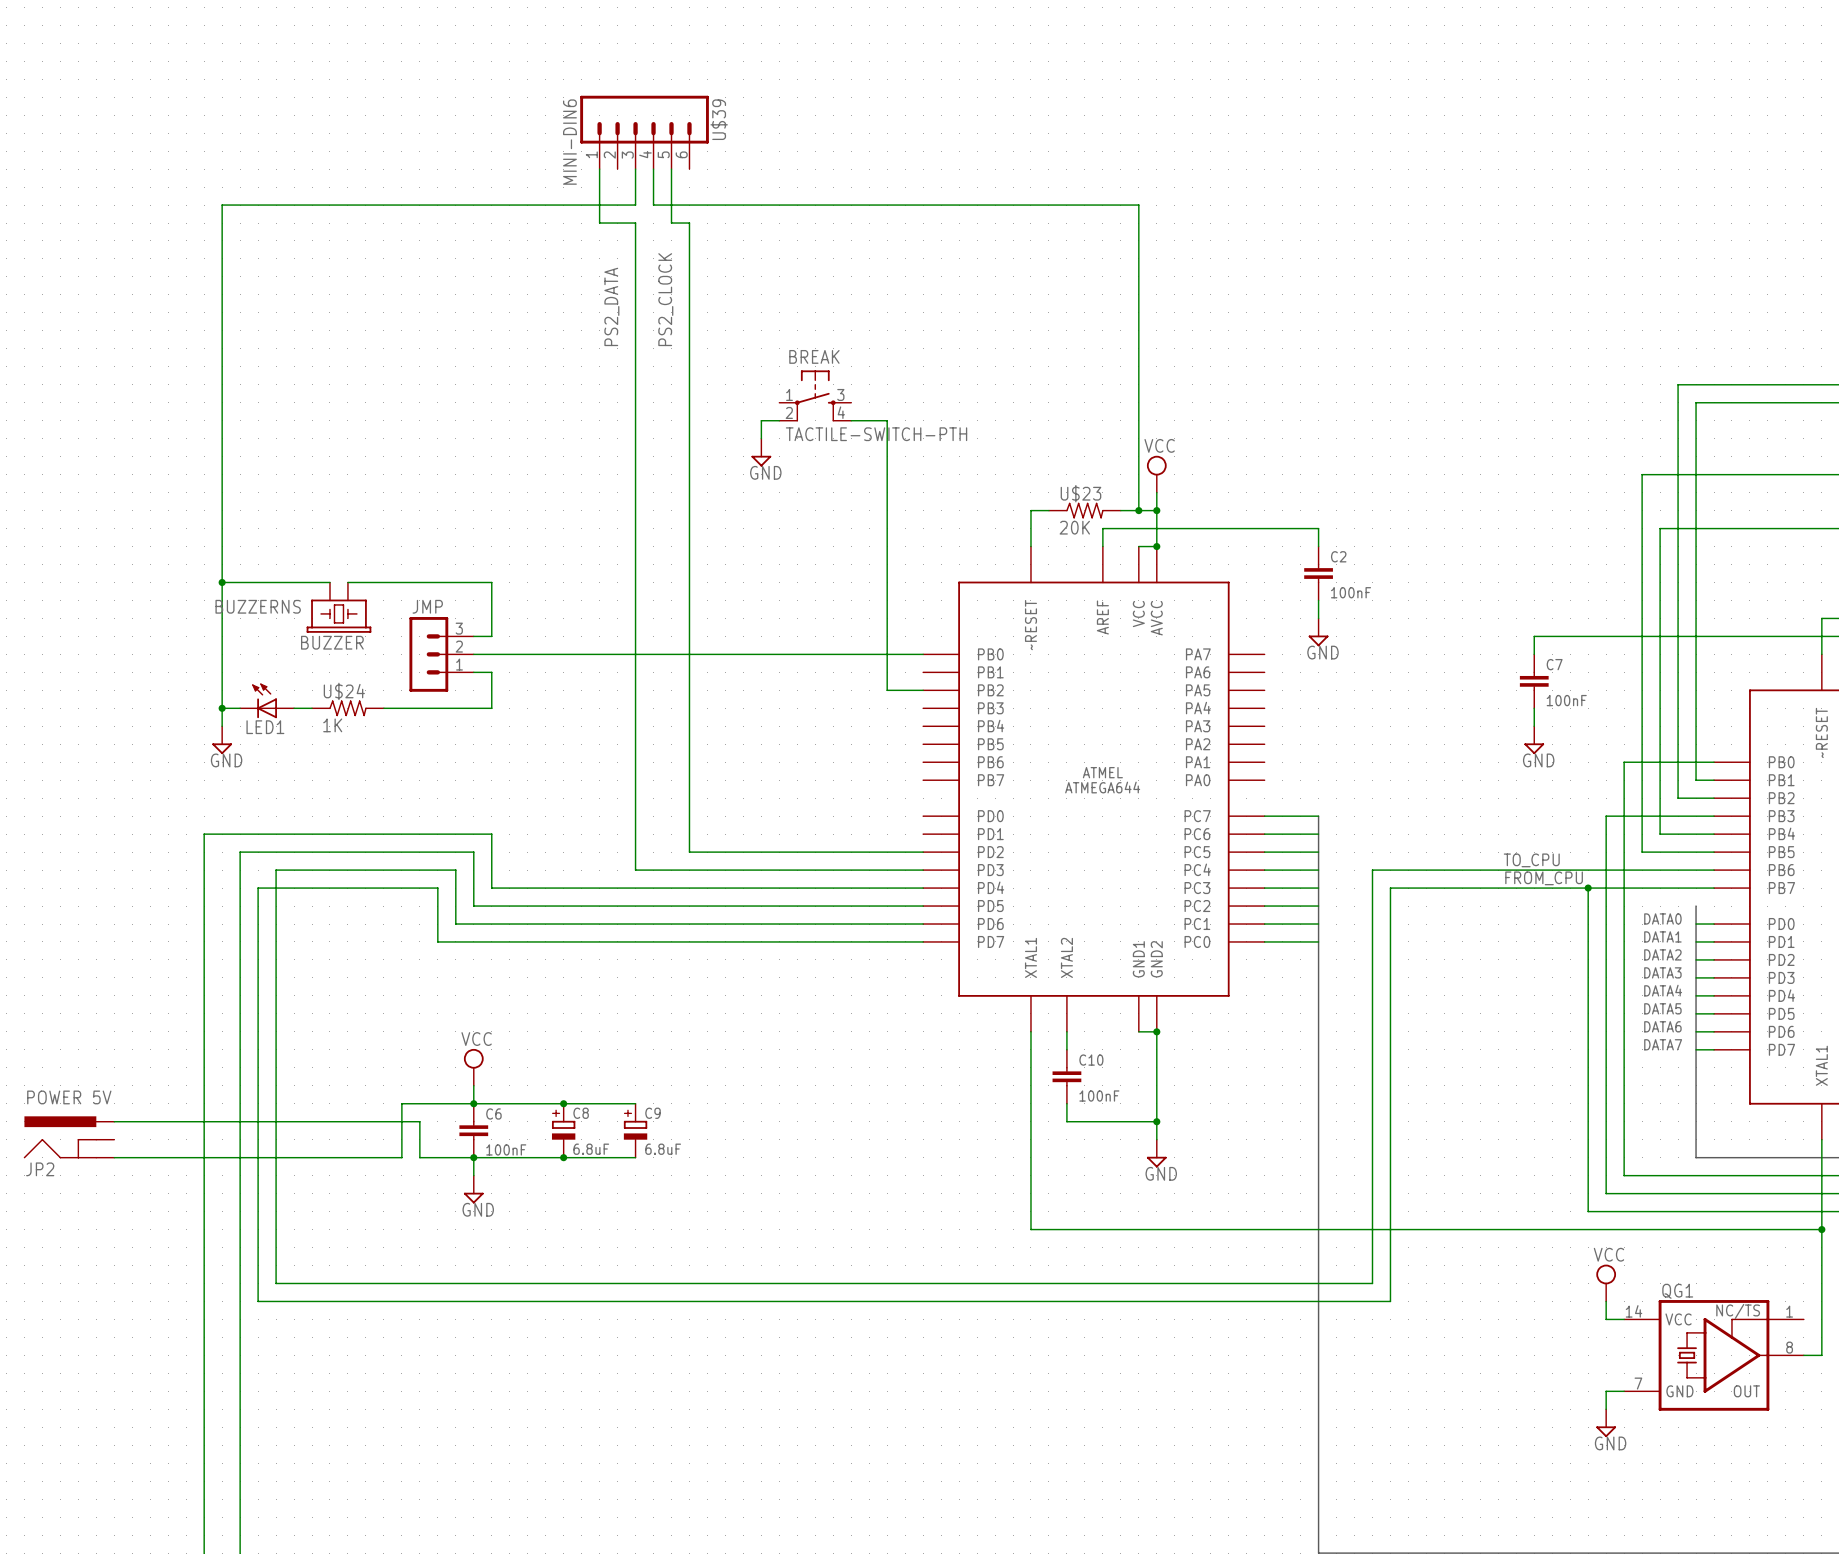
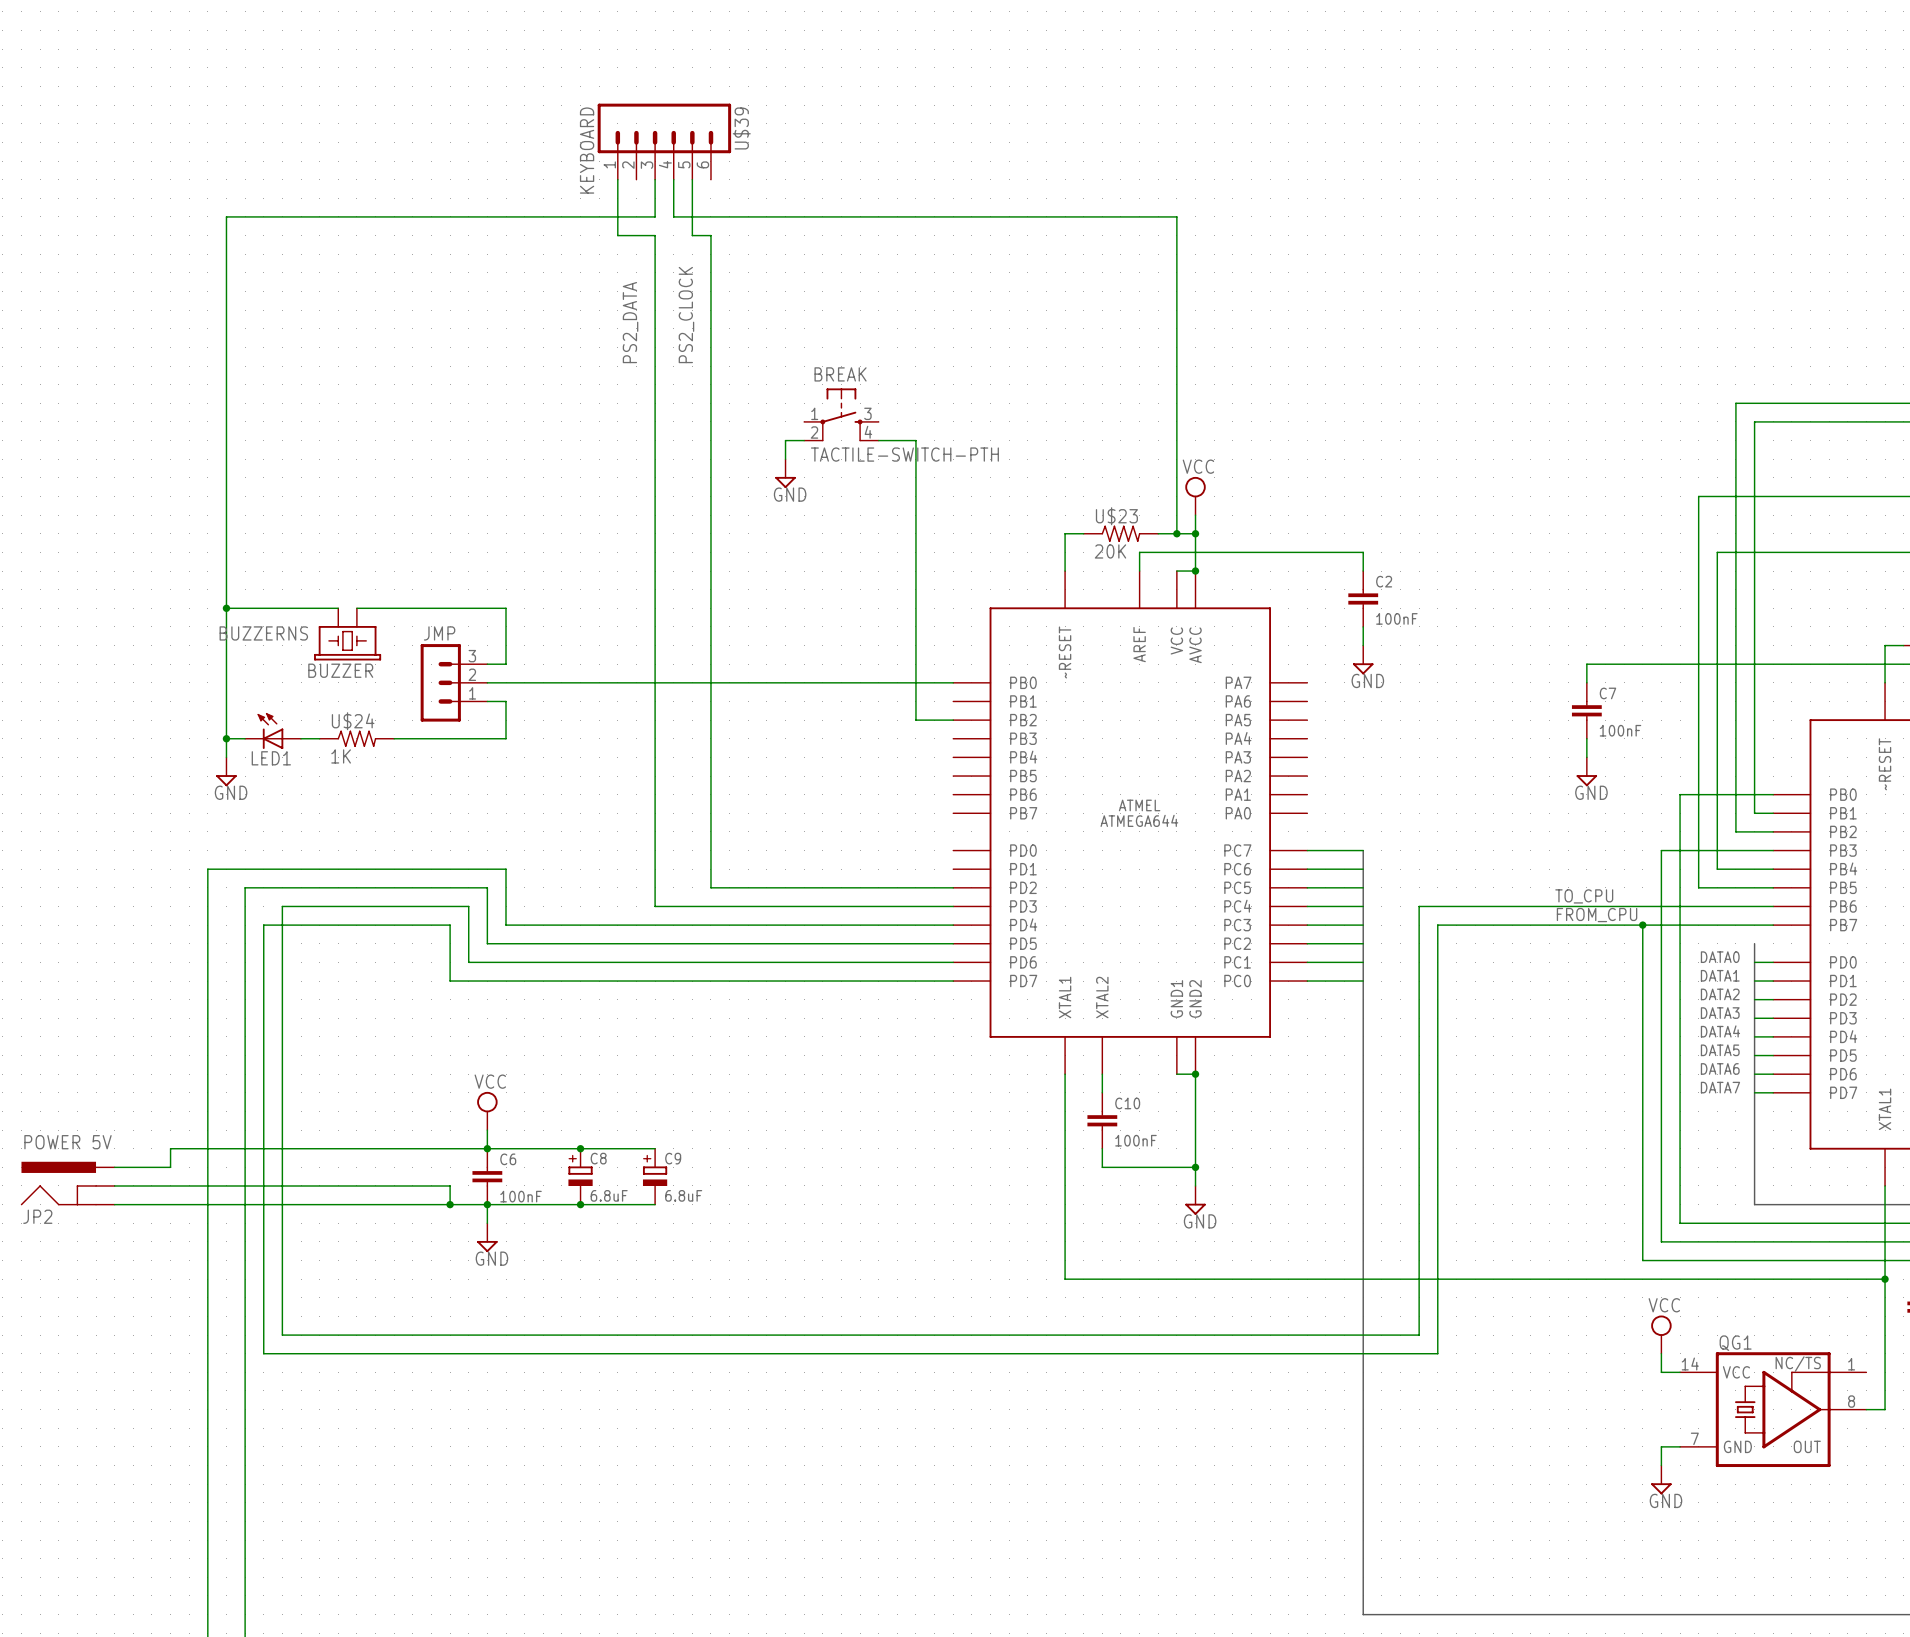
U$39 value: MINI-DIN6 (569, 142) -> KEYBOARD (587, 150)
wire: (401, 1103) (401, 1157) -> (431, 1204) (412, 1204)
wire: (168, 1121) (419, 1121) (419, 1157) -> (170, 1167) (170, 1148) (412, 1148)
wire: none -> (114, 1185) (450, 1185) (450, 1204)
junction: none -> (450, 1204)

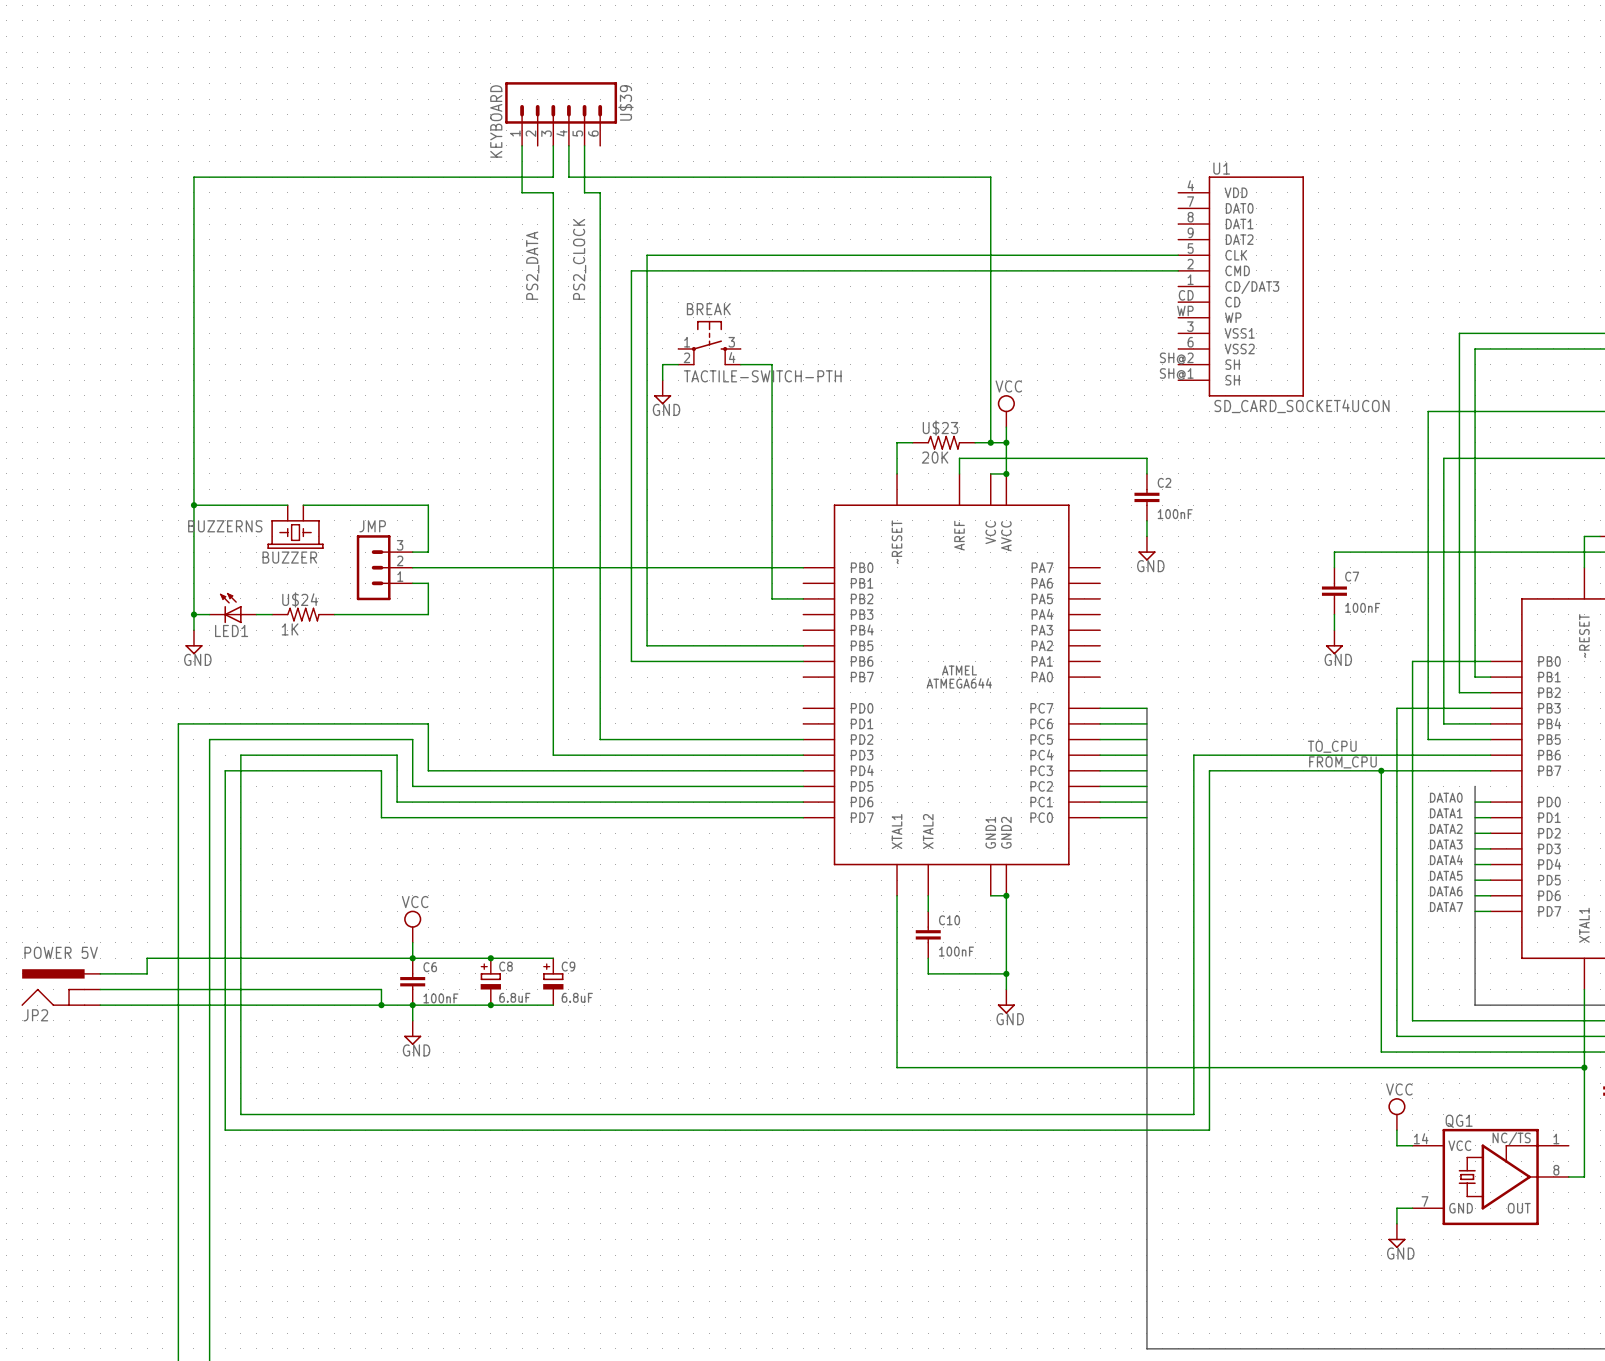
wire: none -> (1178, 255) (647, 255) (647, 645) (803, 645)
wire: none -> (1178, 270) (631, 270) (631, 661) (803, 661)
U1: none -> SD_CARD_SOCKET4UCON (1241, 286)

